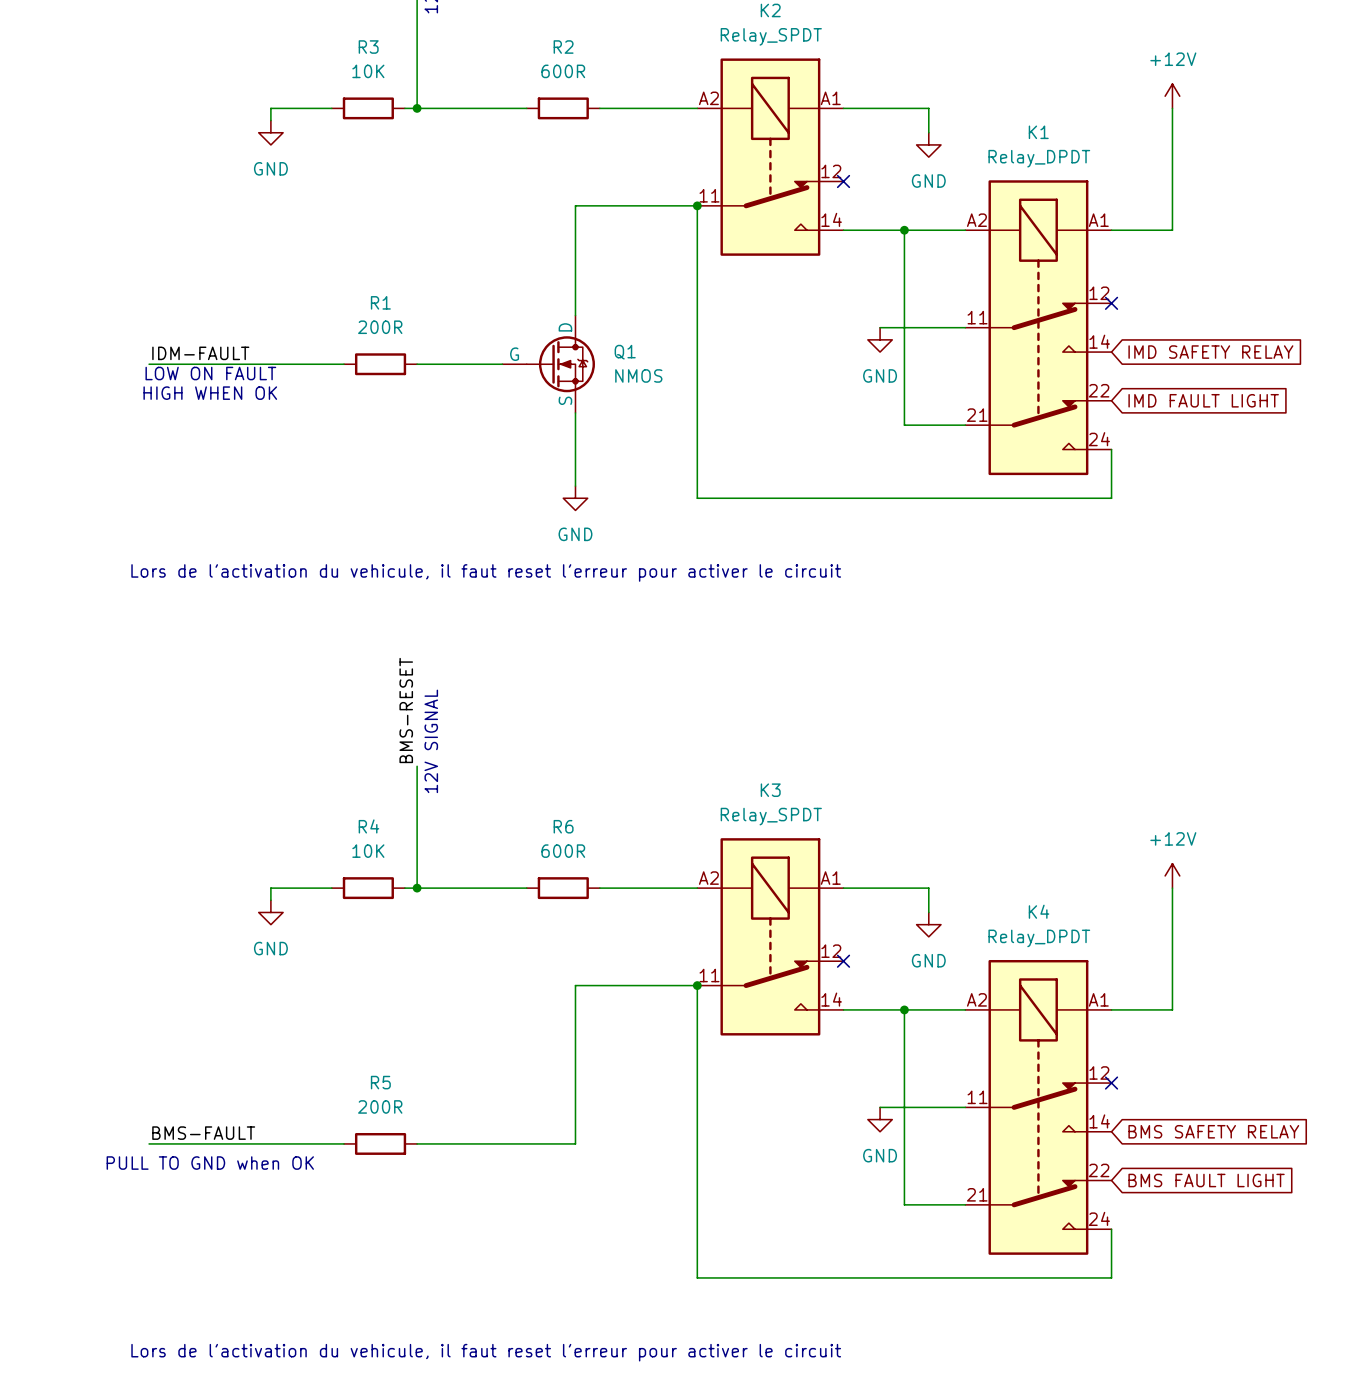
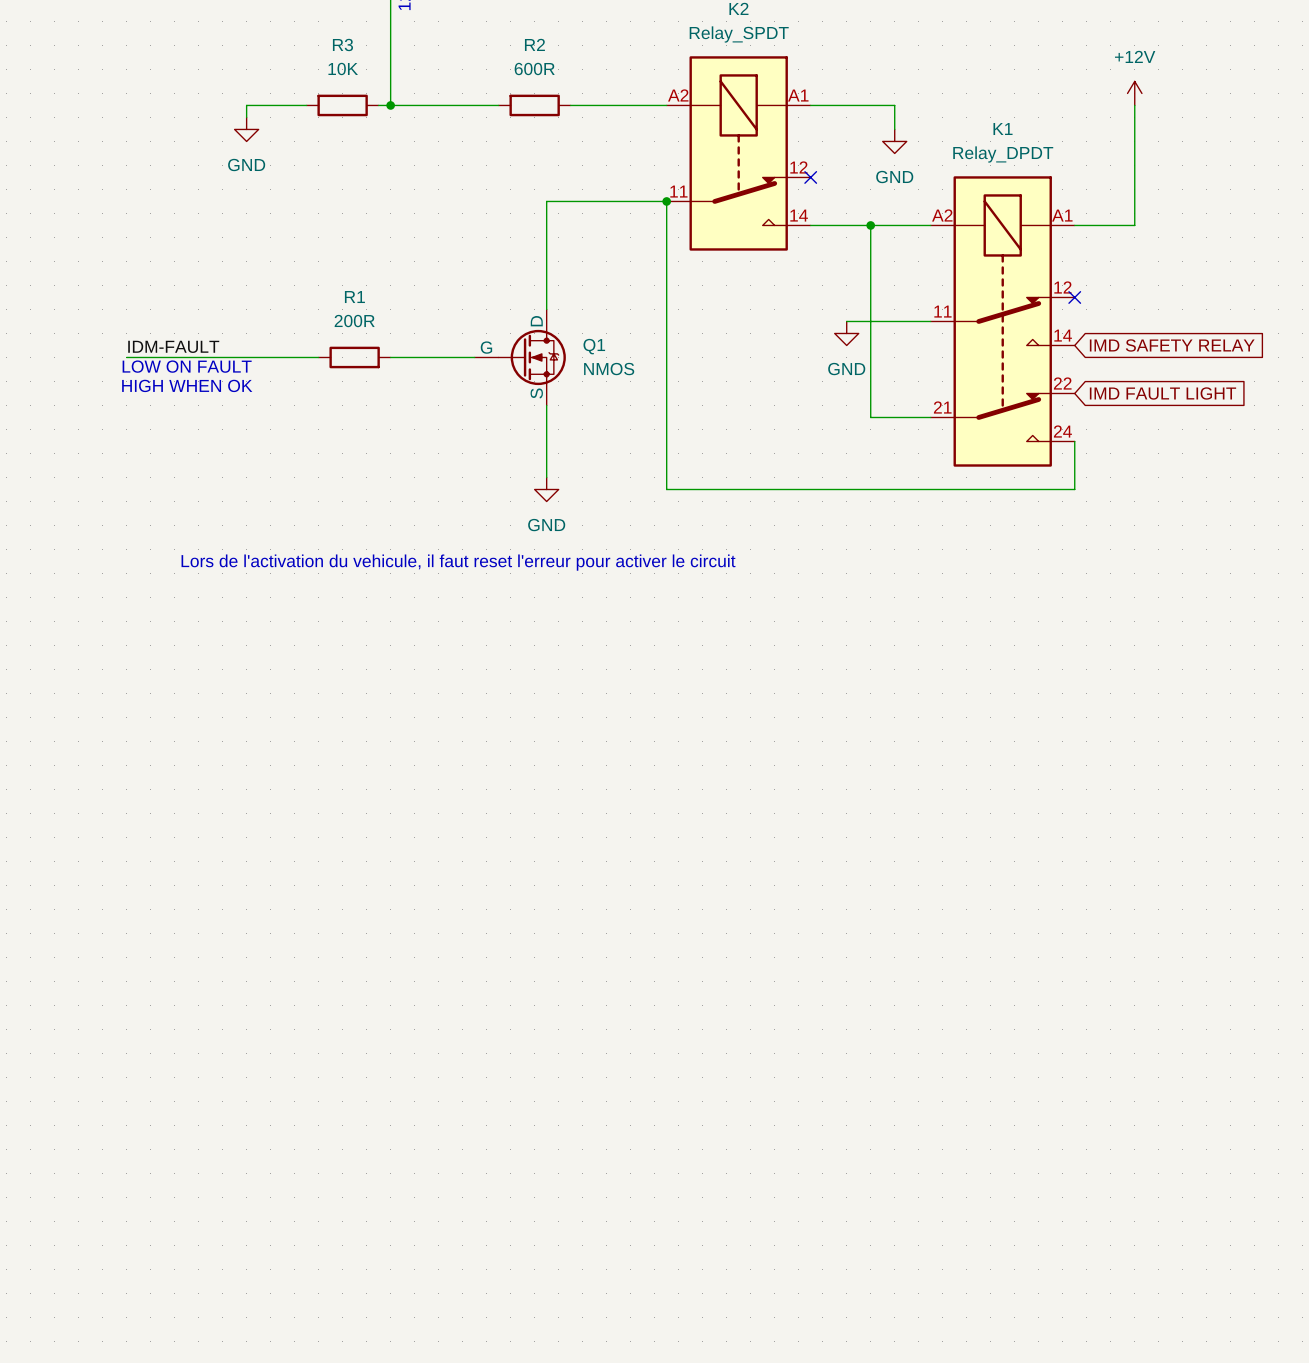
label: BMS-RESET (406, 710) -> none
text: 12V SIGNAL (431, 741) -> none
wire: (417, 766) (417, 888) -> none
power symbol: +12V (1172, 875) -> none
wire: (331, 888) (270, 888) (270, 900) -> none
R4: 10K (368, 888) -> none
wire: (404, 888) (526, 888) -> none
junction: (417, 888) -> none
R6: 600R (563, 888) -> none
wire: (599, 888) (697, 888) -> none
wire: (843, 888) (928, 888) (928, 912) -> none
wire: (1172, 888) (1172, 1009) (1111, 1009) -> none
power symbol: GND (270, 912) -> none
power symbol: GND (928, 924) -> none
K3: Relay_SPDT (770, 936) -> none
no-connect mark: (843, 961) -> none
junction: (697, 985) -> none
wire: (843, 1009) (965, 1009) -> none
wire: (904, 1009) (904, 1204) (965, 1204) -> none
junction: (904, 1009) -> none
no-connect mark: (1111, 1083) -> none
wire: (880, 1107) (965, 1107) -> none
K4: Relay_DPDT (1038, 1107) -> none
power symbol: GND (880, 1119) -> none
global label: BMS SAFETY RELAY (1213, 1131) -> none
label: BMS-FAULT (203, 1133) -> none
wire: (149, 1143) (344, 1143) -> none
R5: 200R (380, 1143) -> none
wire: (417, 1143) (575, 1143) (575, 985) (697, 985) (697, 1277) (1111, 1277) (1111, 1229) -> none
text: PULL TO GND when OK (210, 1163) -> none
global label: BMS FAULT LIGHT (1206, 1180) -> none
text: Lors de l'activation du vehicule, il faut reset l'erreur pour activer le circuit (486, 1352) -> none

